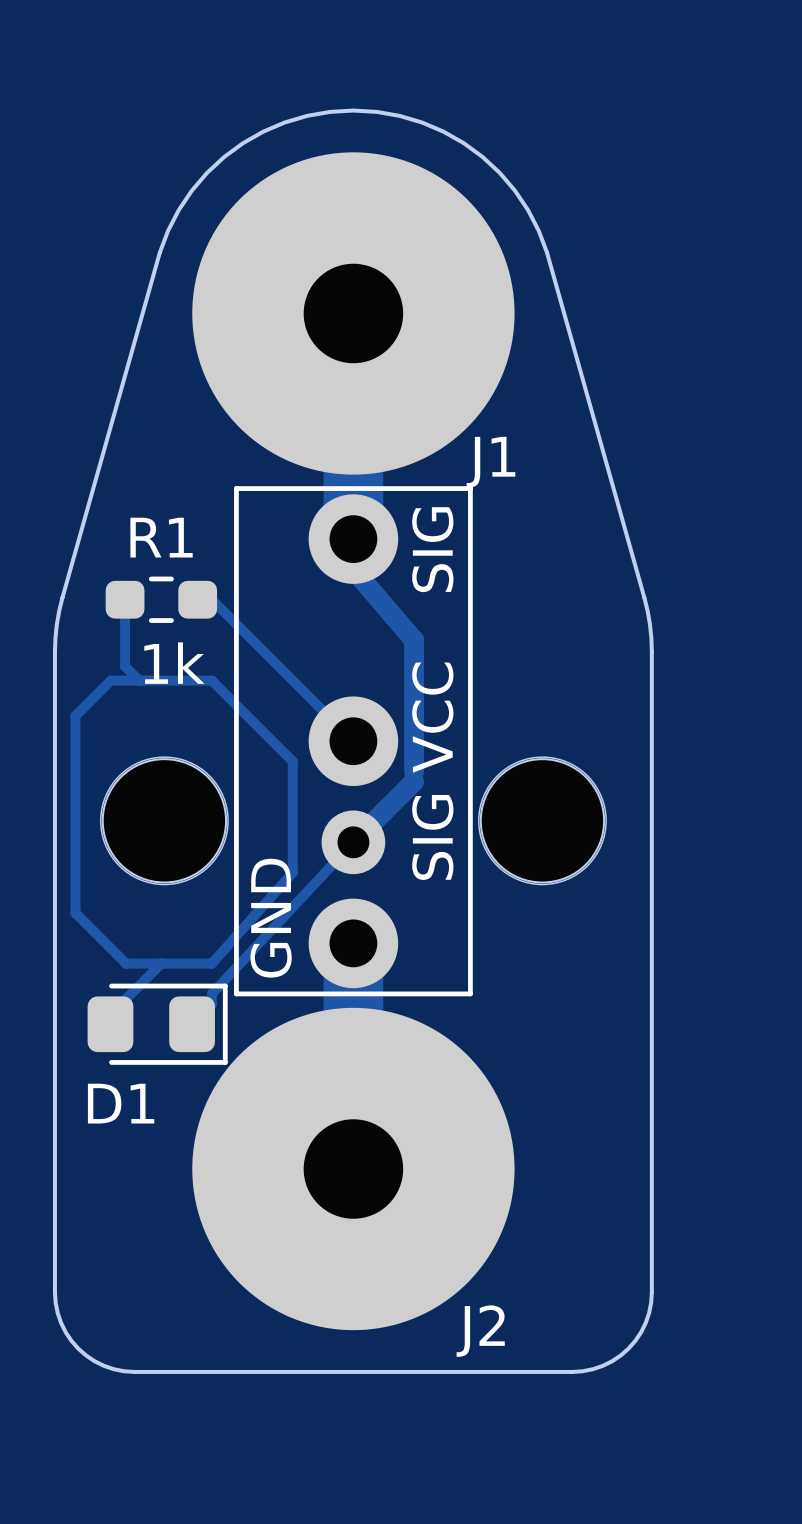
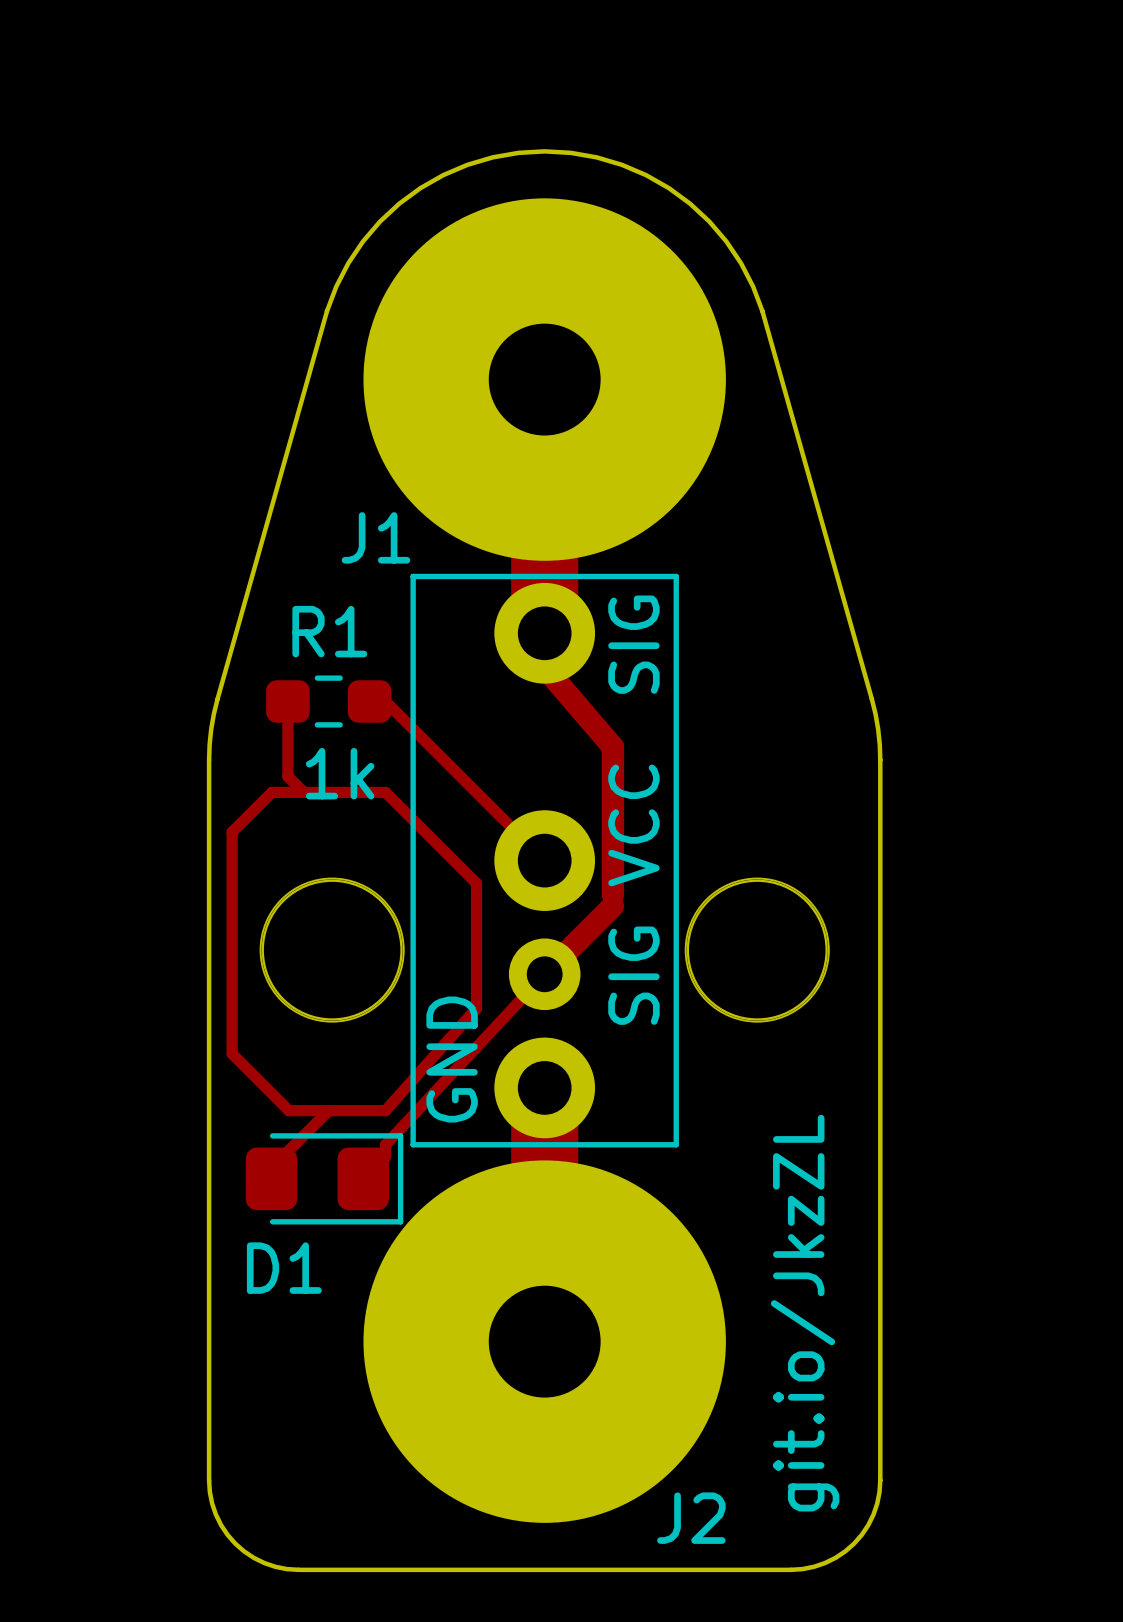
J1 name position: J1 (490, 462) -> J1 (375, 537)
text: none -> git.io/JkzZL (805, 1313)

